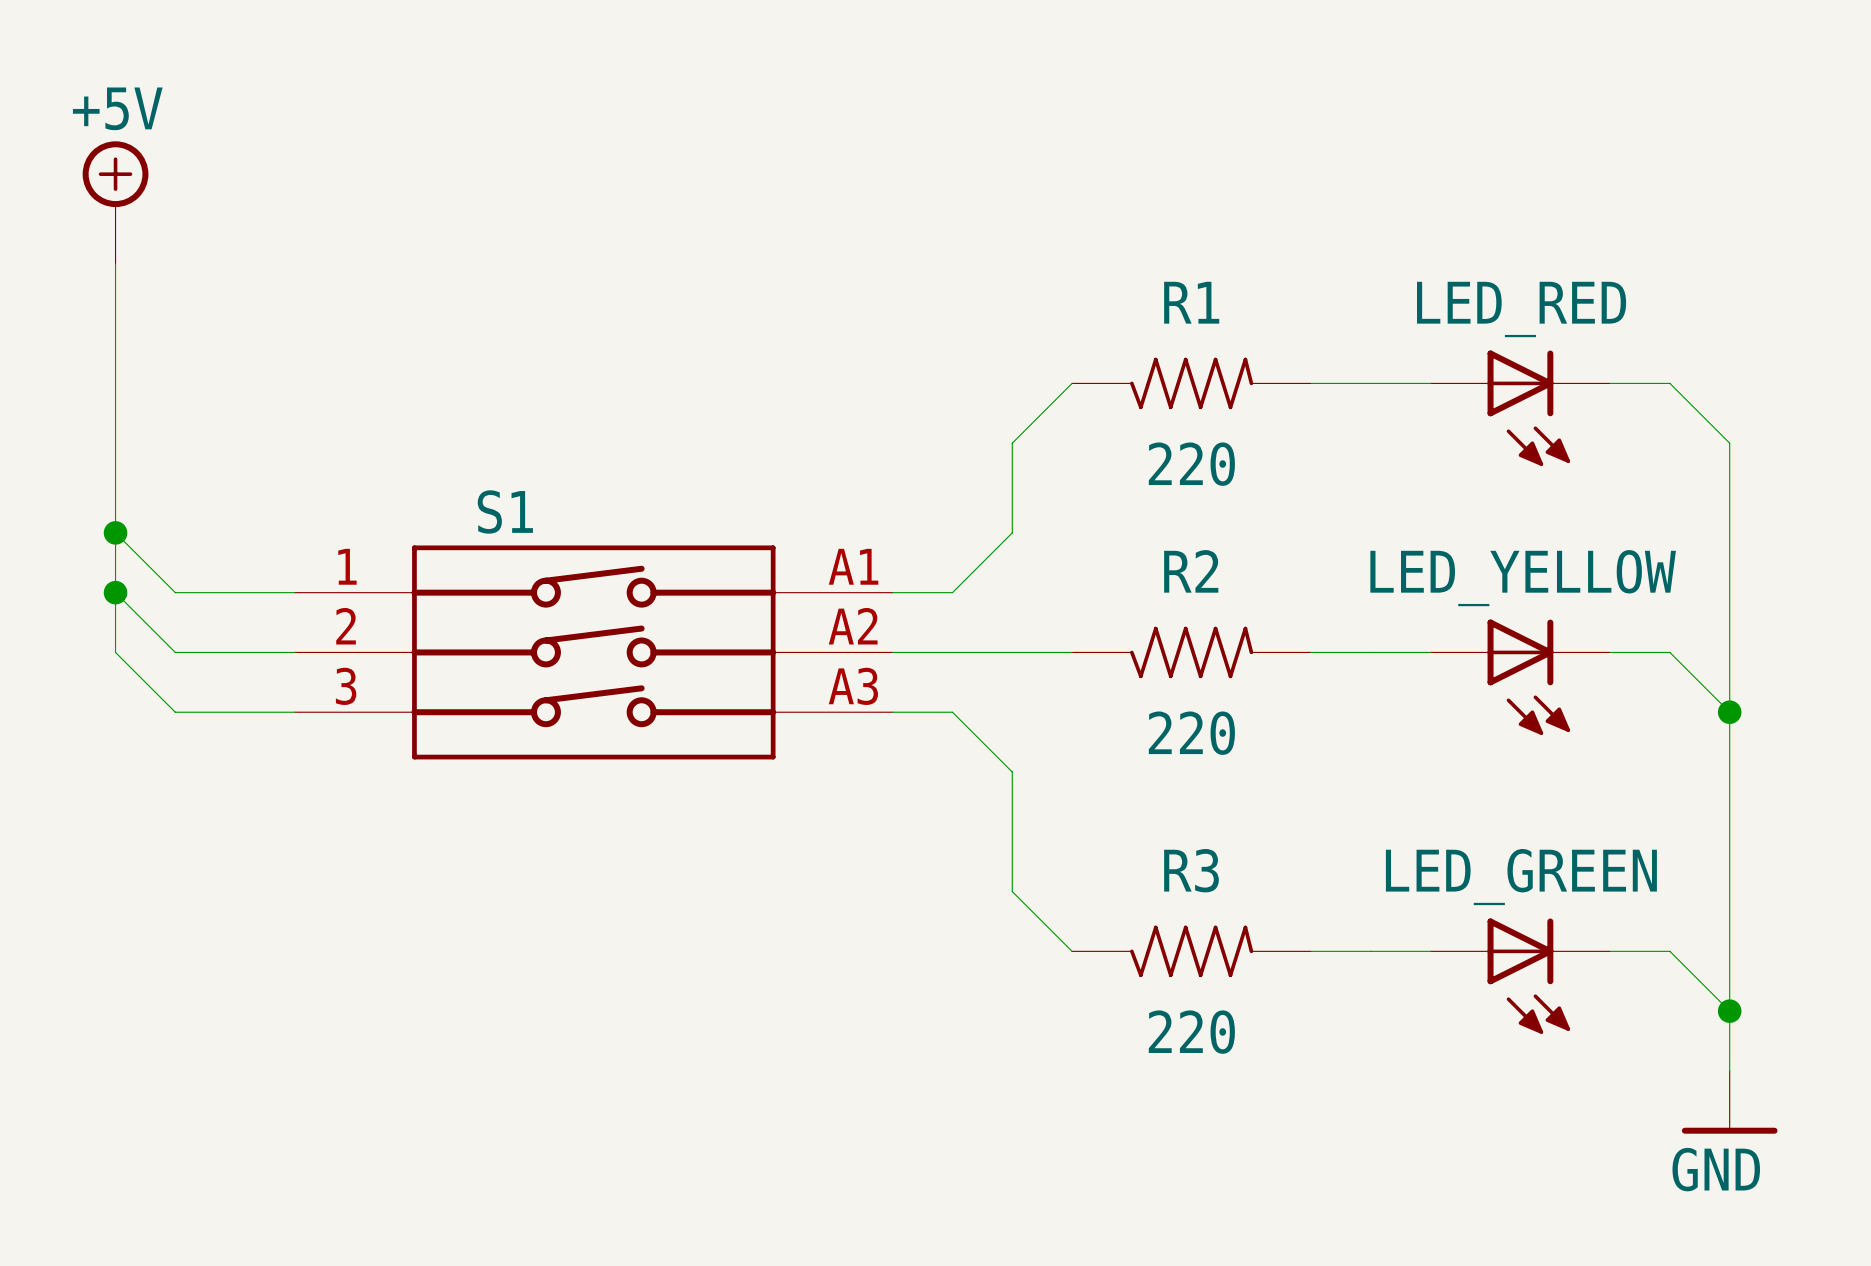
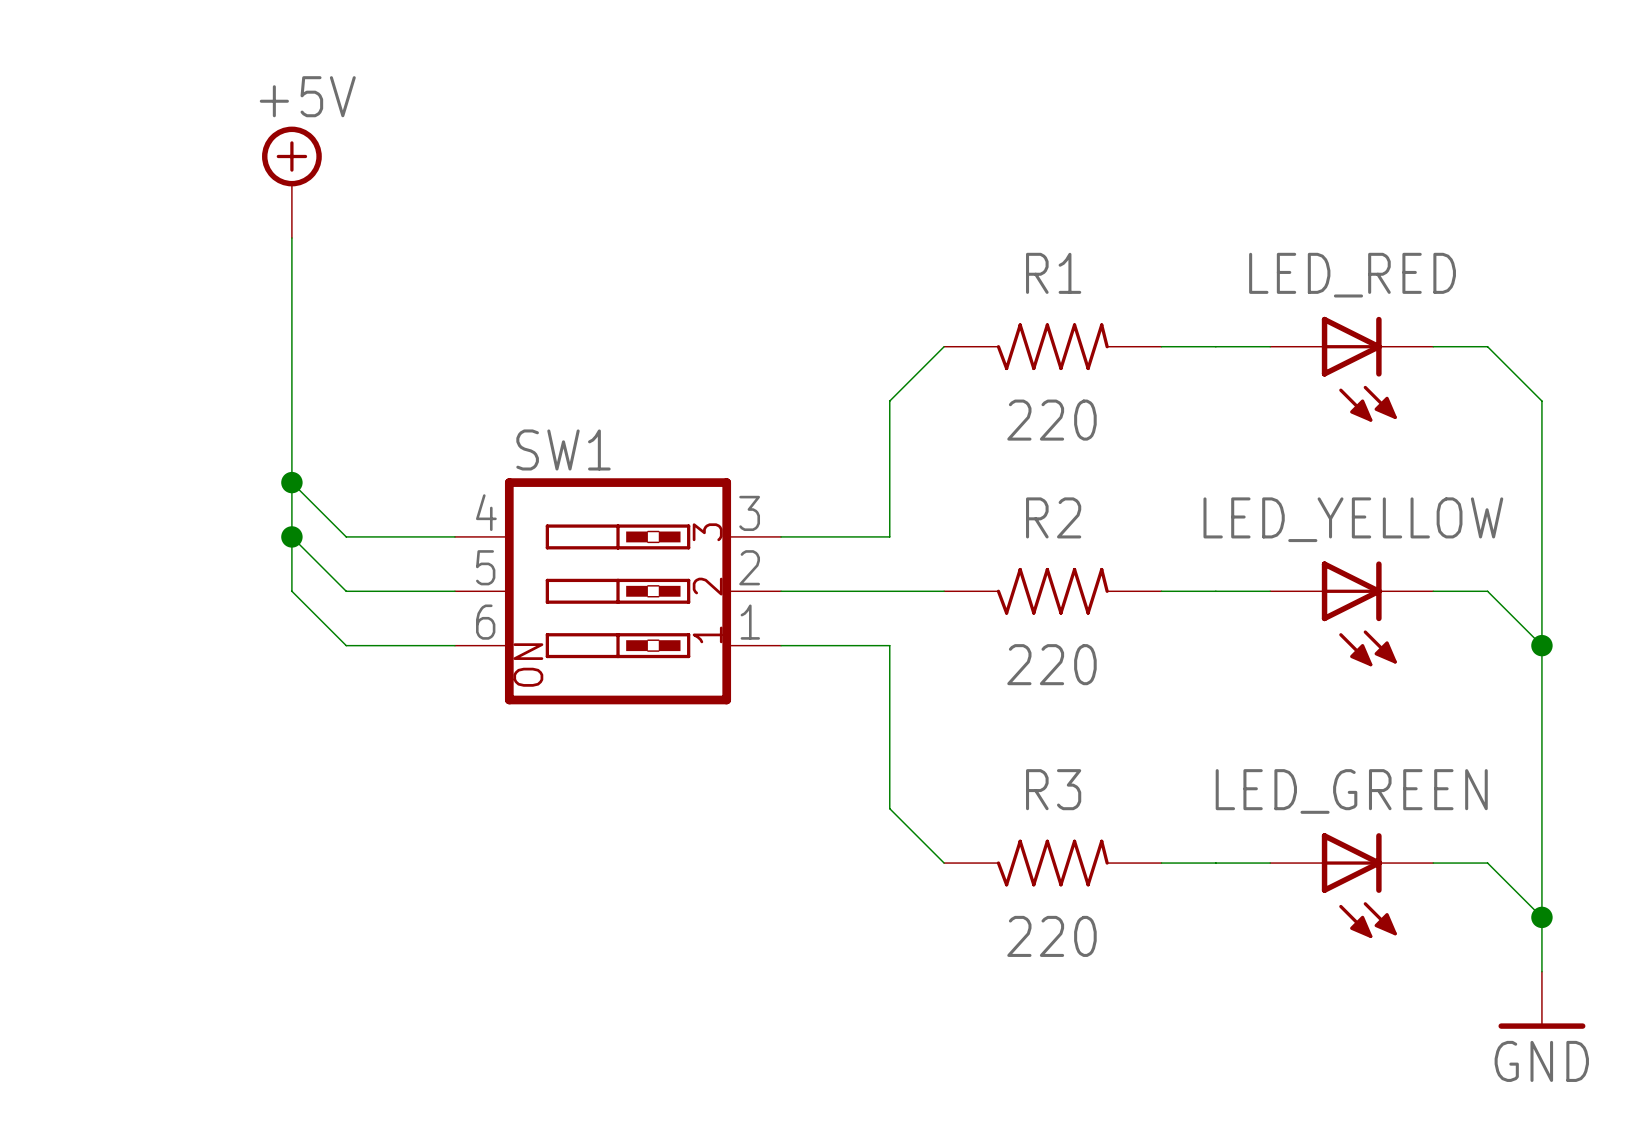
power symbol position: +5V (115, 202) -> +5V (291, 182)
wire: (115, 263) (115, 652) (175, 712) (294, 712) -> (291, 238) (291, 591) (346, 645) (454, 645)
wire: (115, 532) (175, 592) (294, 592) -> (291, 482) (346, 536) (454, 536)
junction: (115, 532) -> none
junction: none -> (291, 482)
wire: (1012, 532) (952, 592) -> (889, 482) (889, 536) (835, 536)
wire: (115, 592) (175, 652) (294, 652) -> (291, 536) (346, 591) (454, 591)
junction: (115, 592) -> none
junction: none -> (291, 536)
S1: (593, 652) -> none
SW1: none -> (618, 591)
wire: (952, 712) (1012, 772) -> (835, 645) (889, 645) (889, 699)

